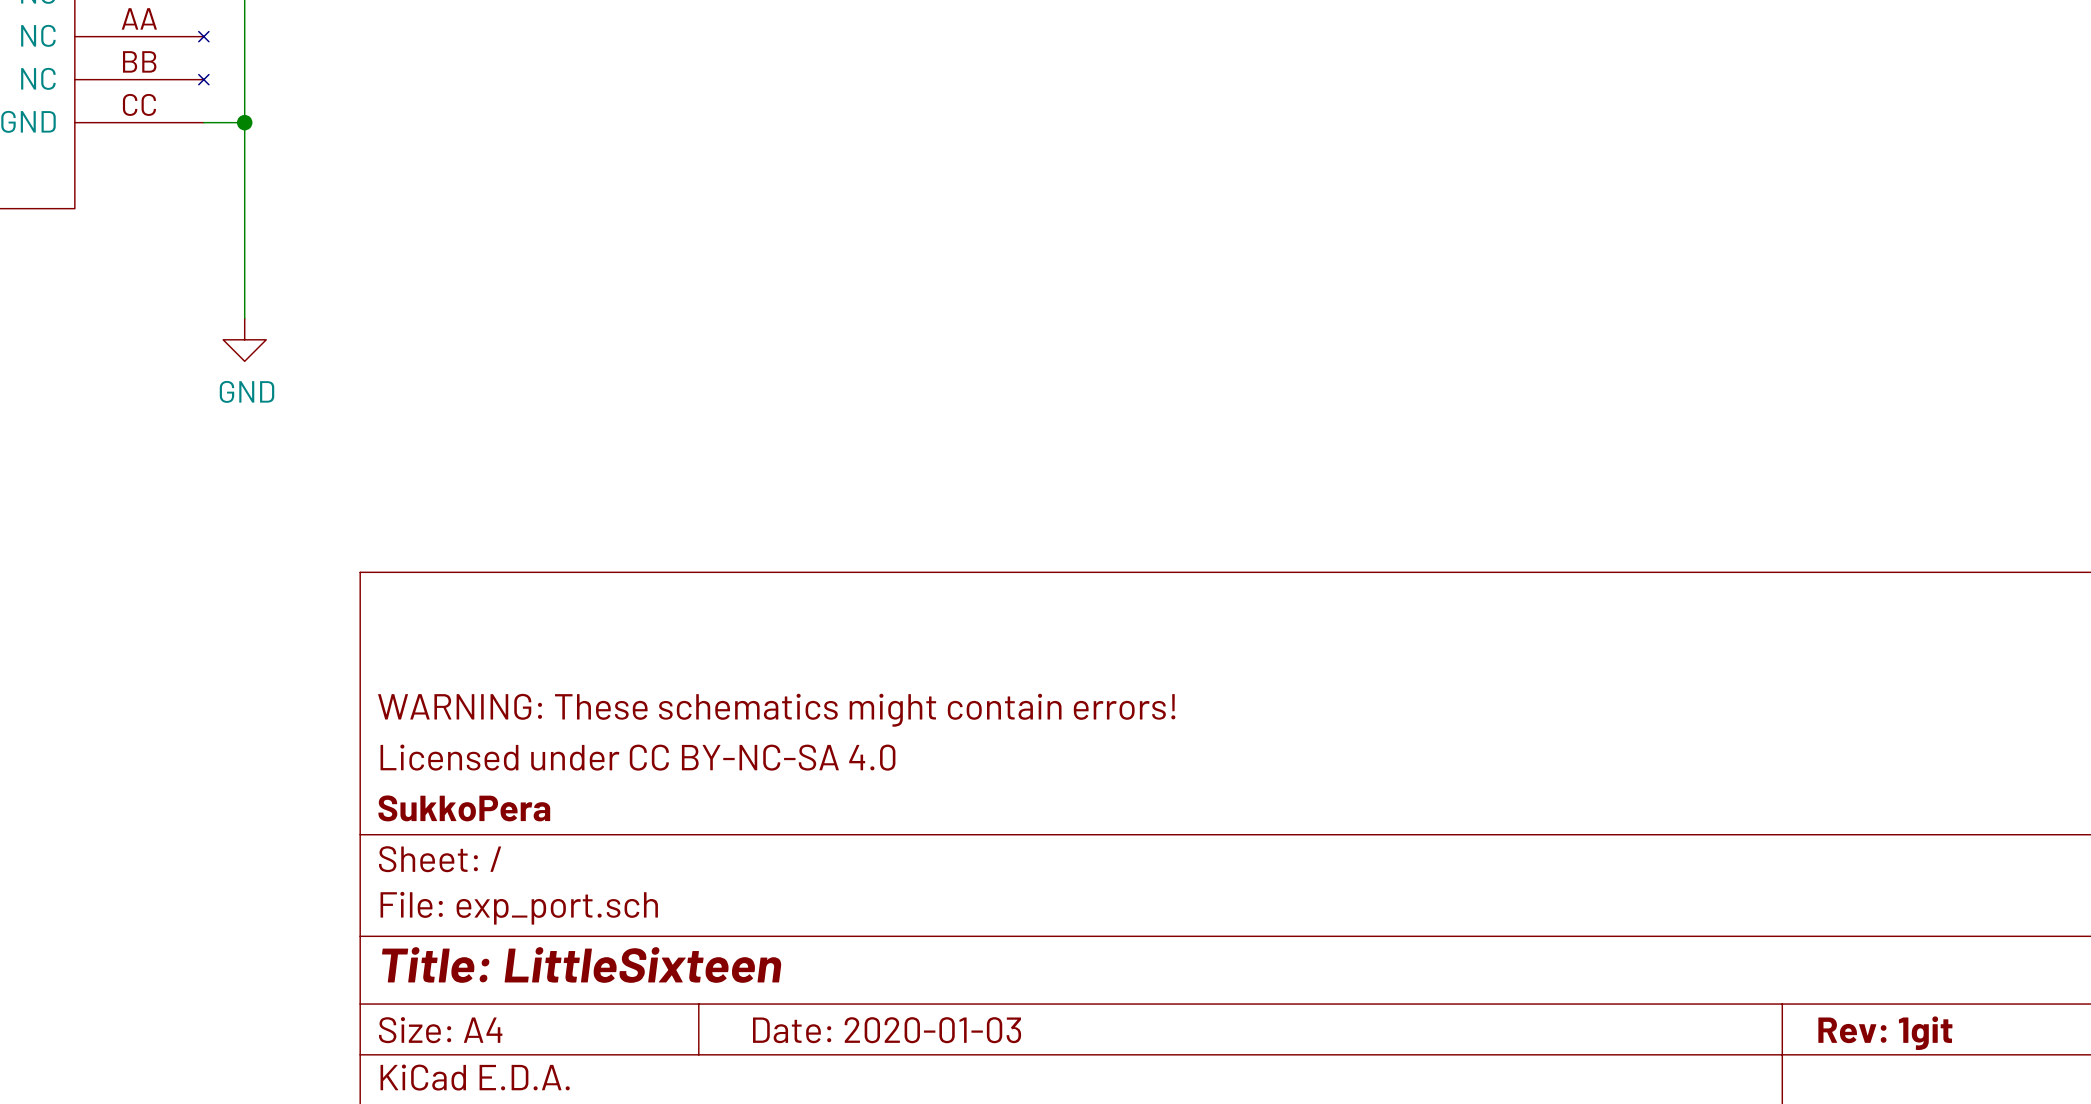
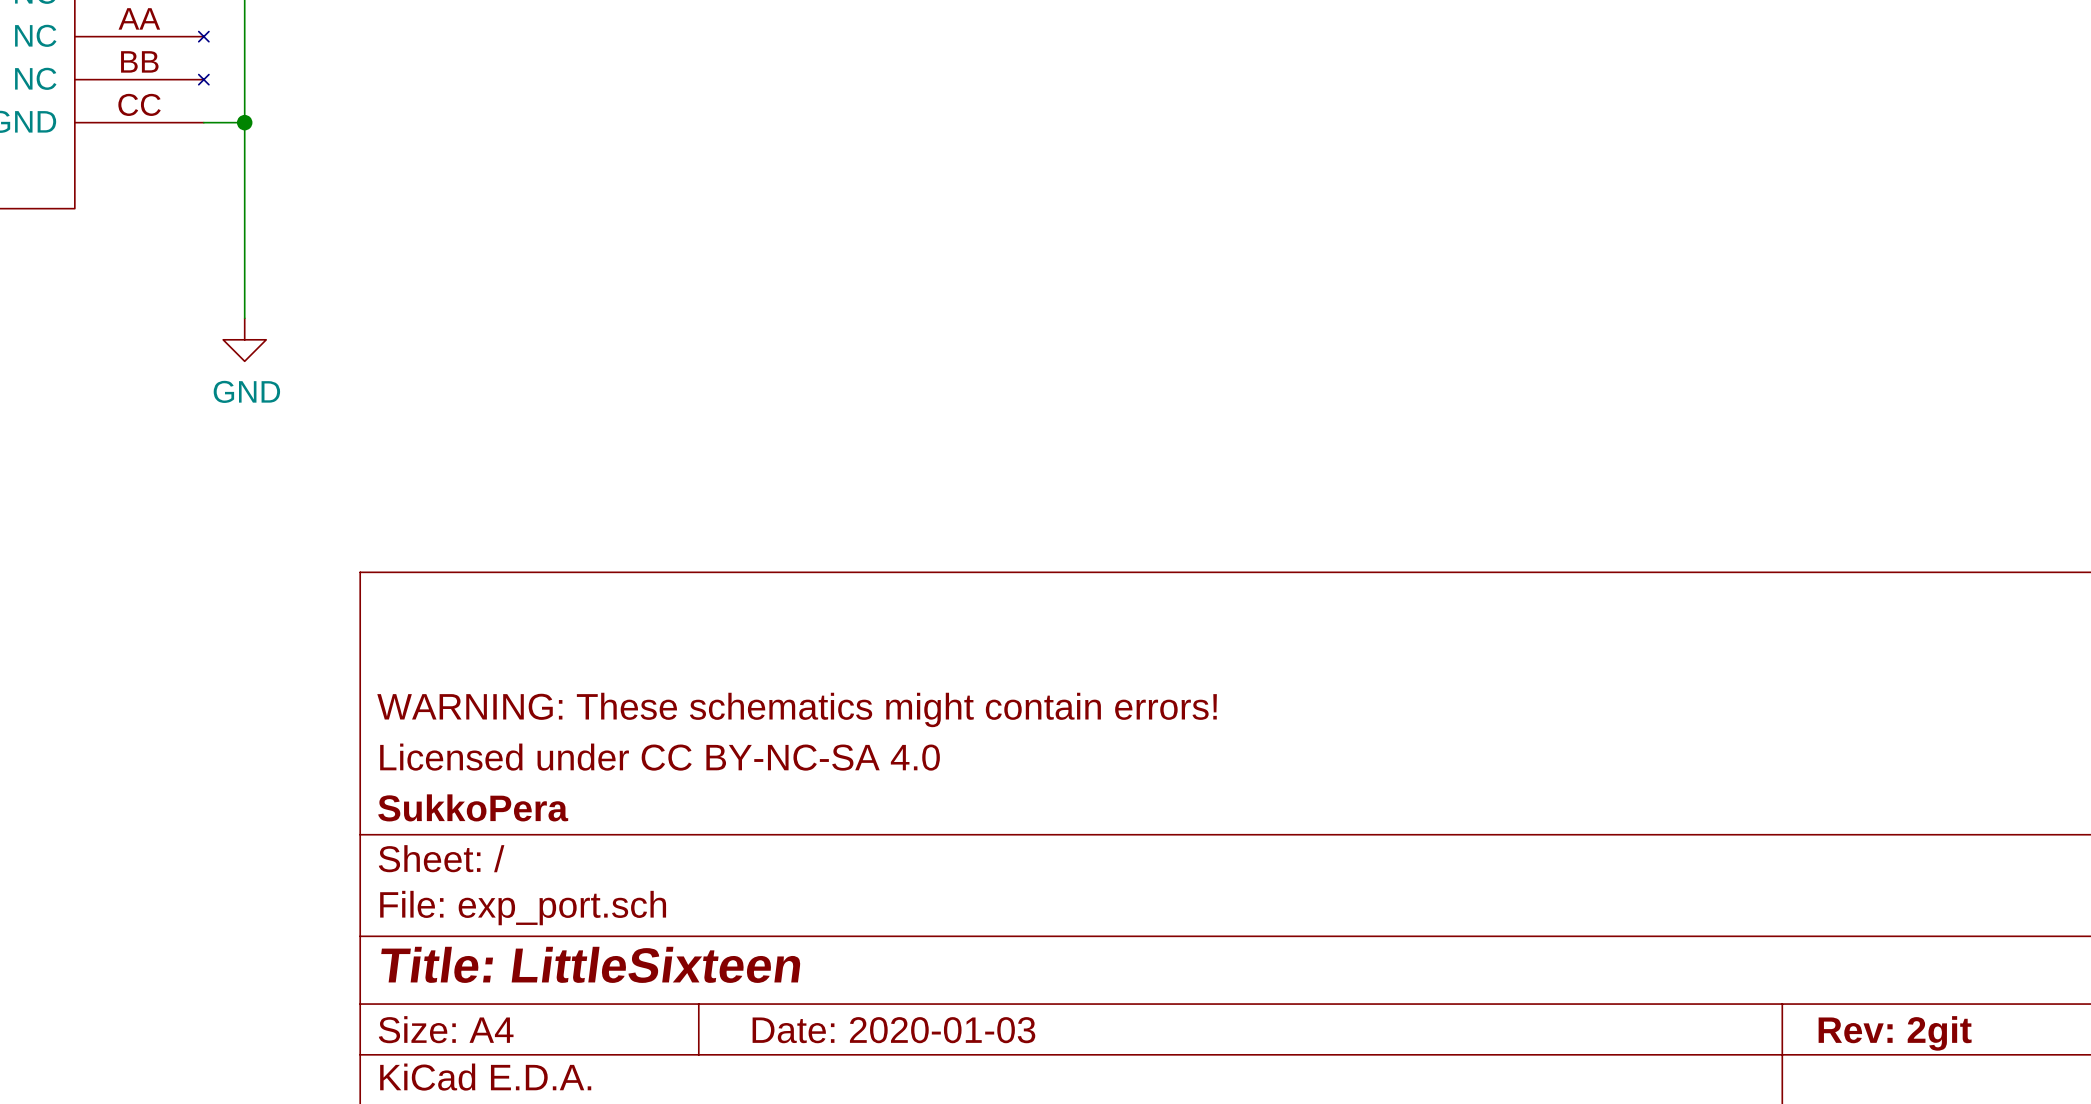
title block: Rev: 1git (1885, 1033) -> Rev: 2git (1895, 1033)

